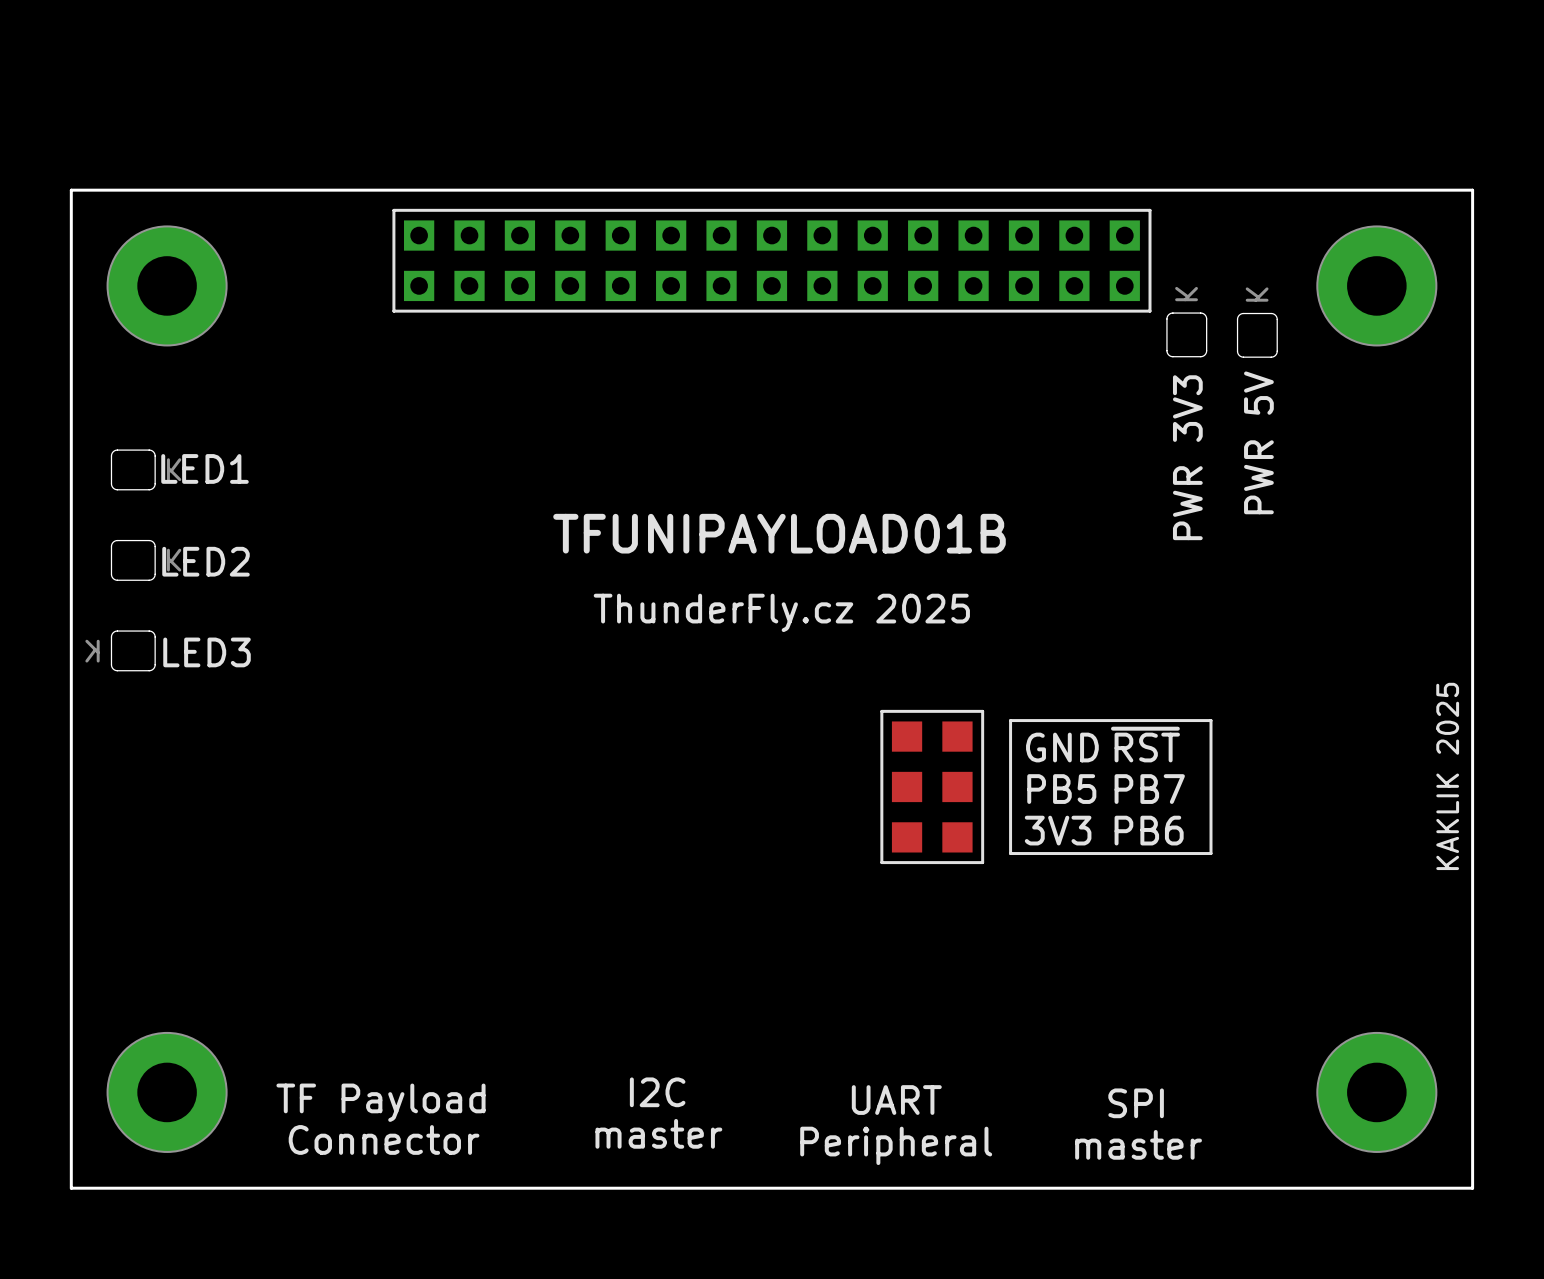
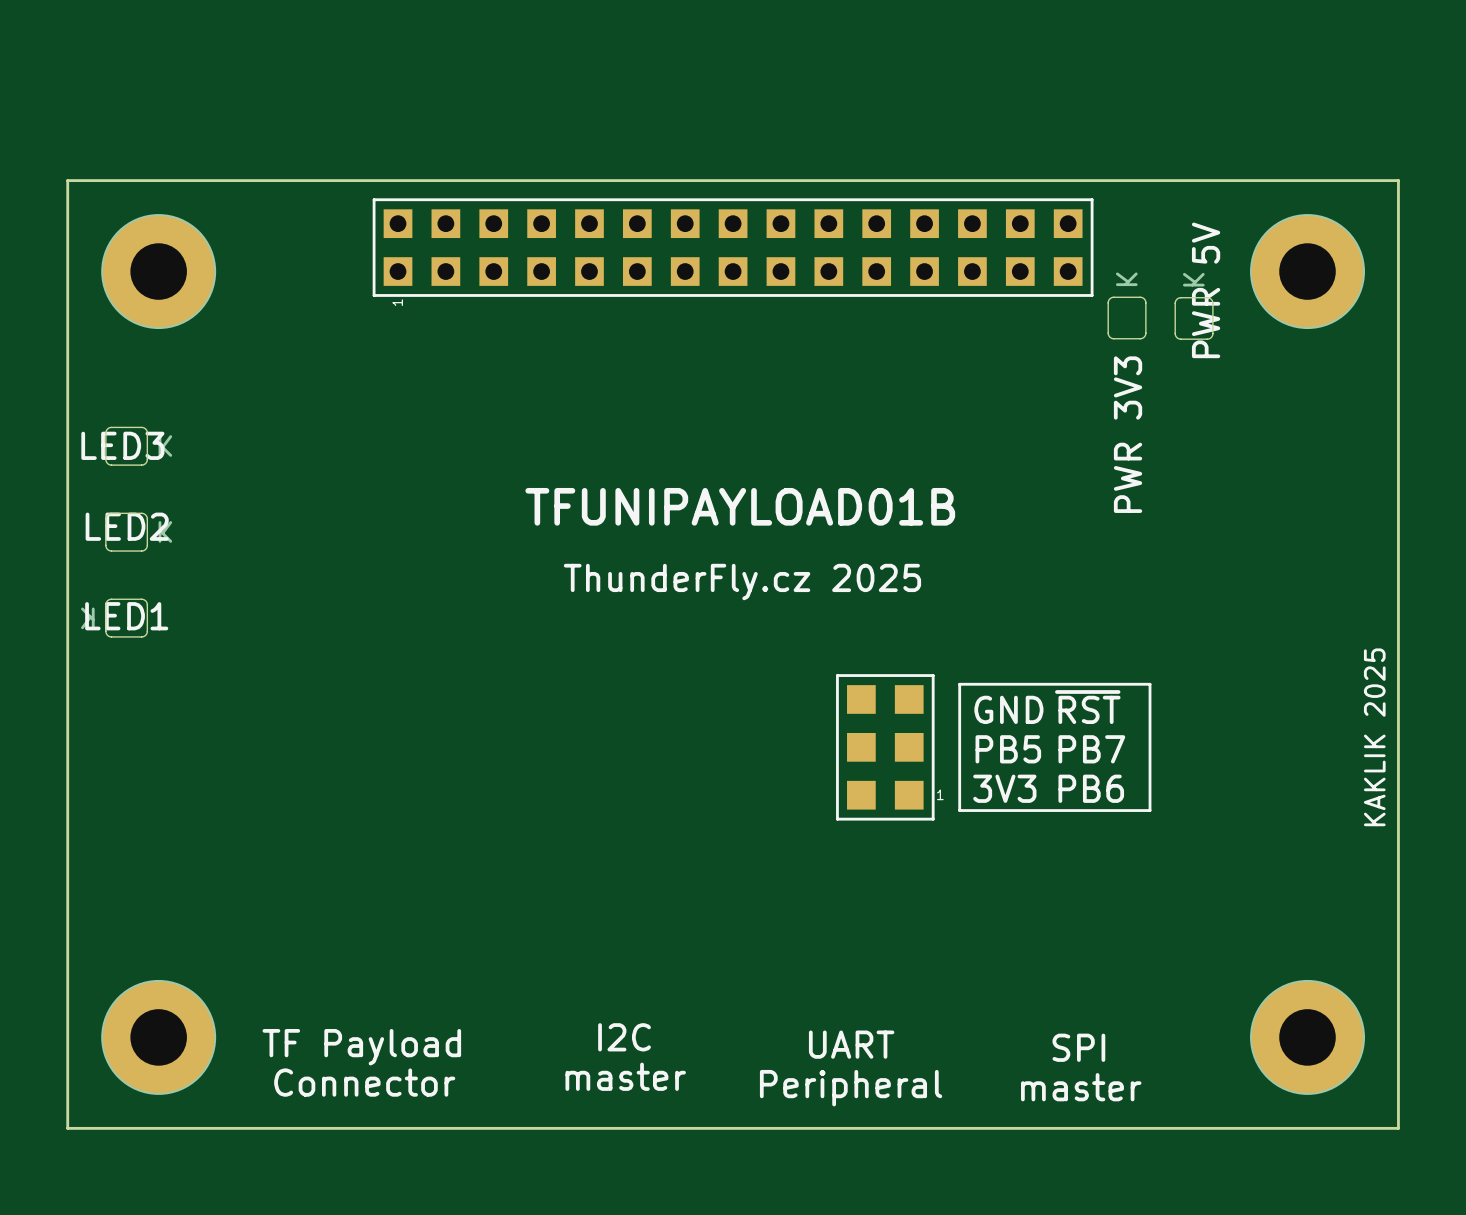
part text: none -> 1 (397, 302)
text position: PWR 5V (1258, 442) -> PWR 5V (1206, 290)
text position: LED1 (205, 468) -> LED1 (126, 616)
text position: LED2 (206, 561) -> LED2 (127, 526)
text position: LED3 (207, 652) -> LED3 (122, 445)
part text: none -> 1 (940, 794)

